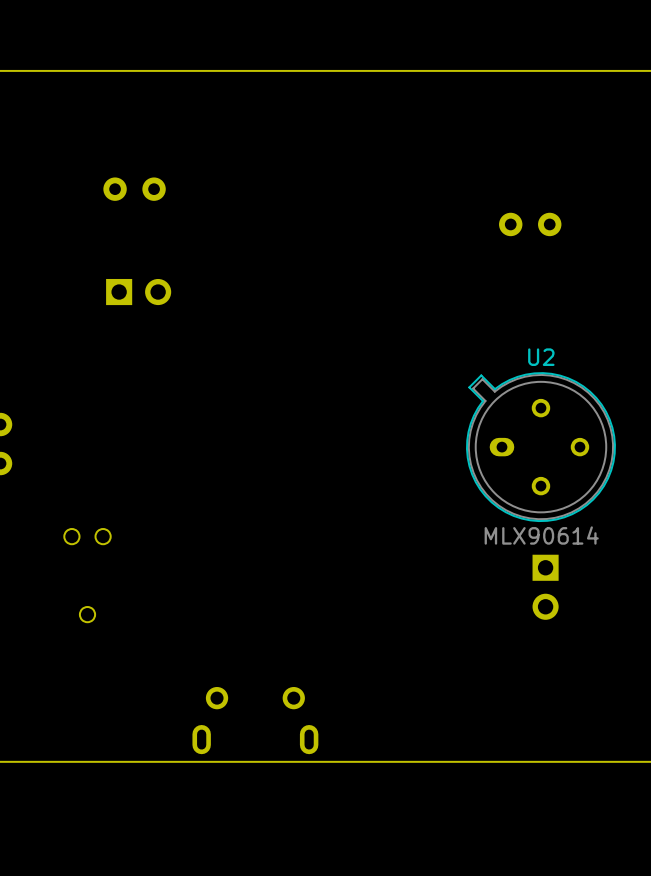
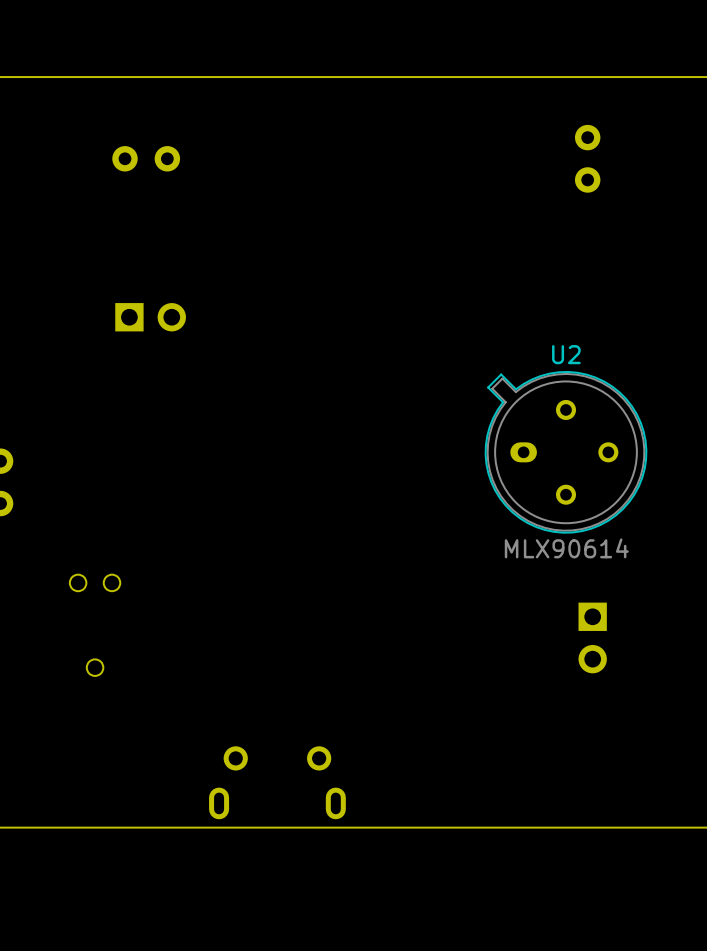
part position: (134, 189) -> (146, 158)
part rotation: 0° (530, 224) -> 90° clockwise (587, 158)
part position: (530, 224) -> (587, 158)
U2 position: (540, 447) -> (566, 452)

